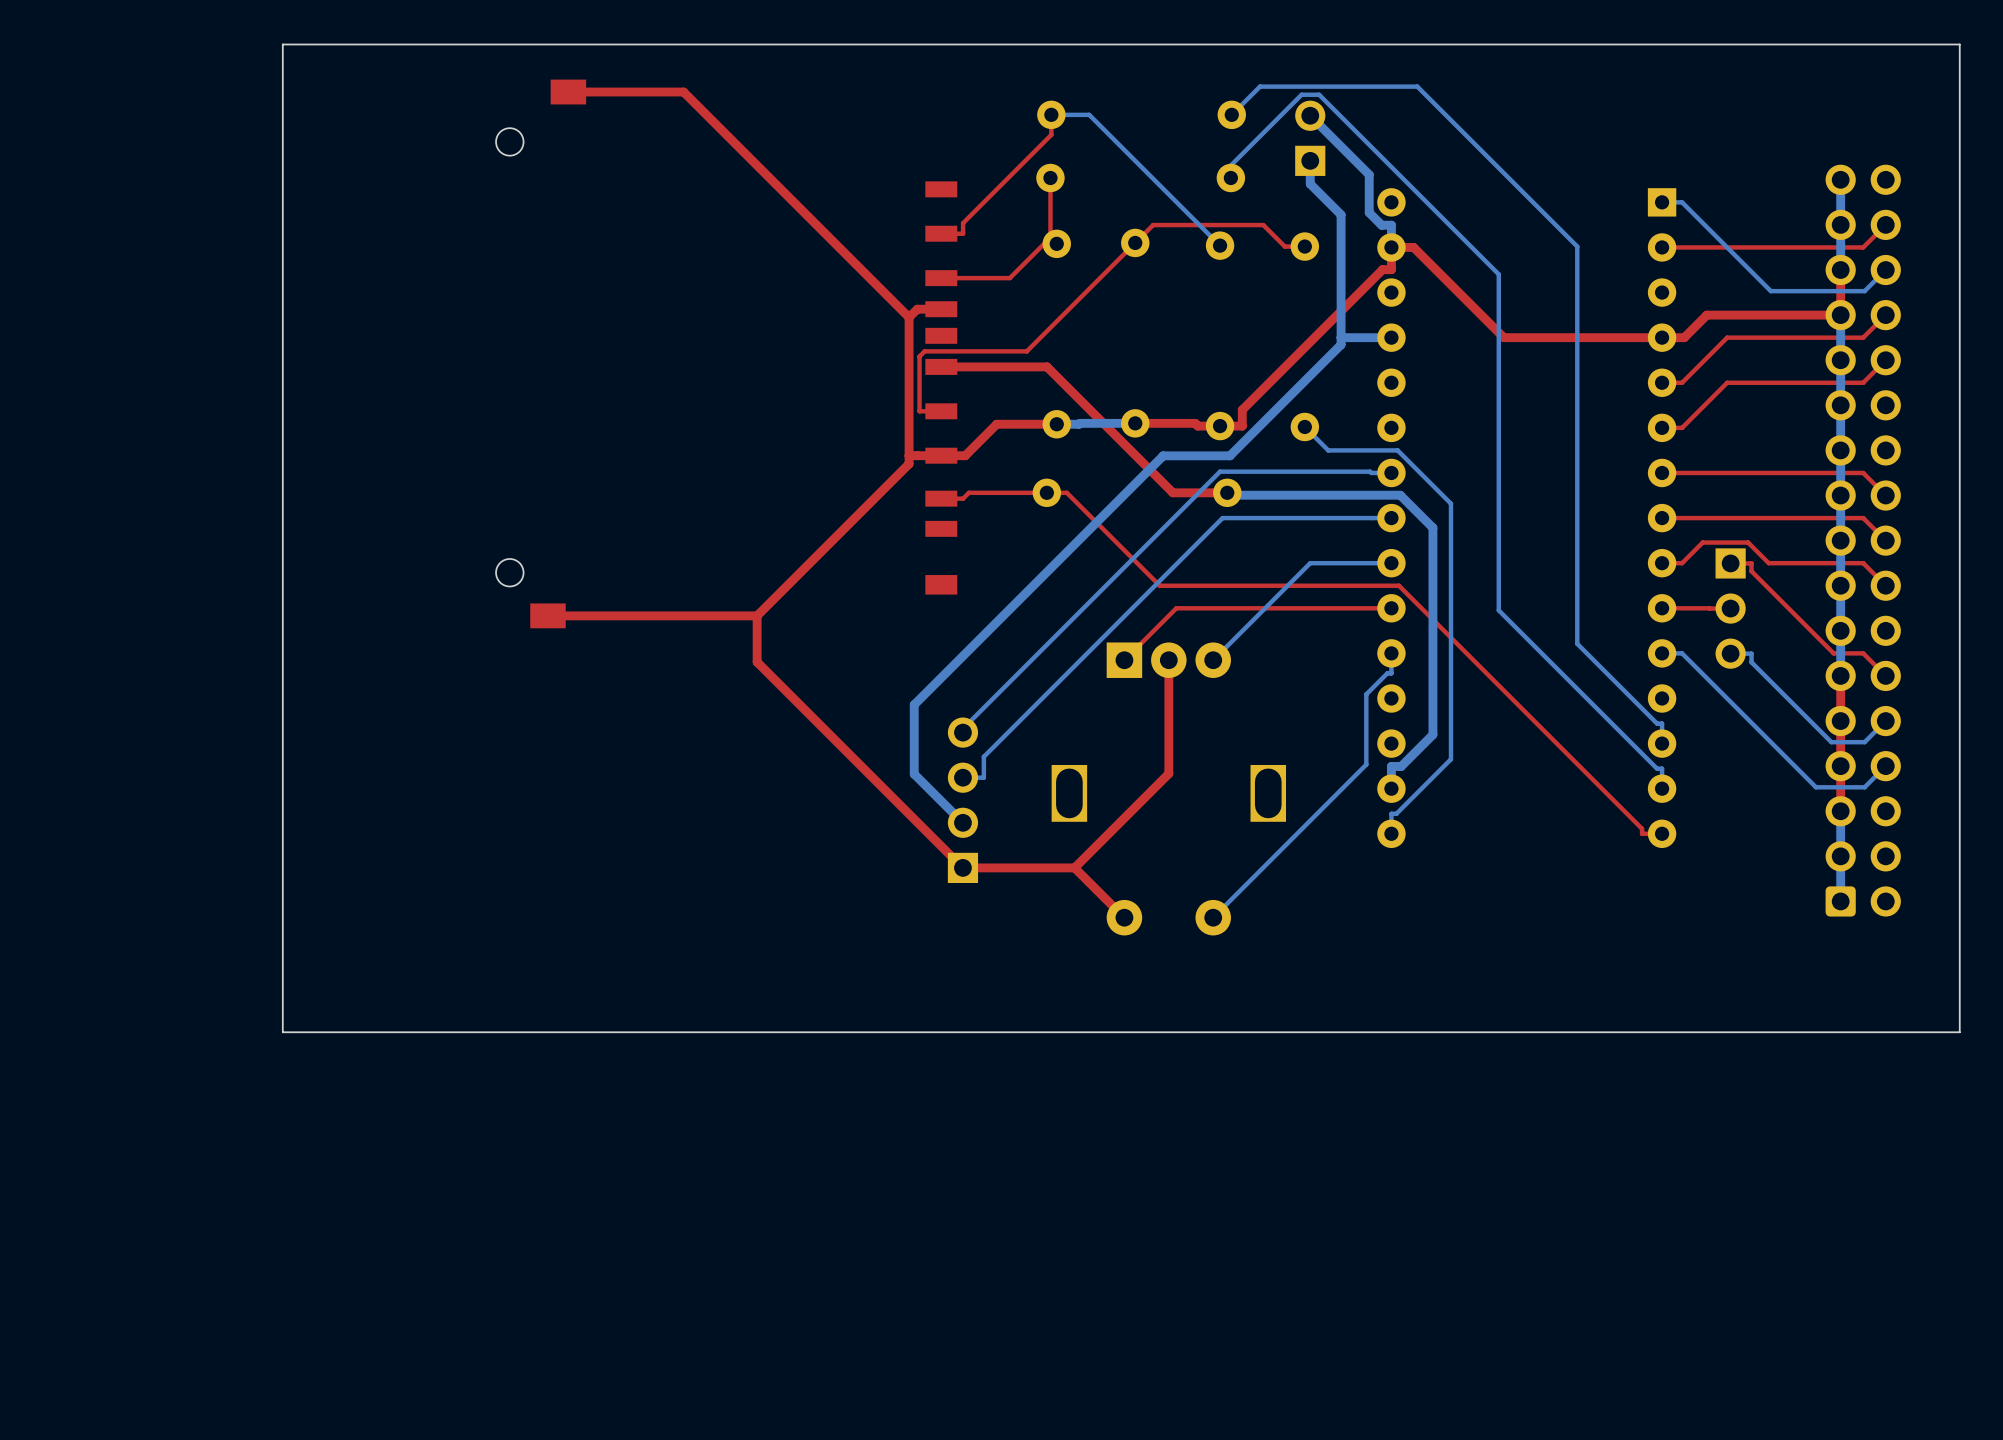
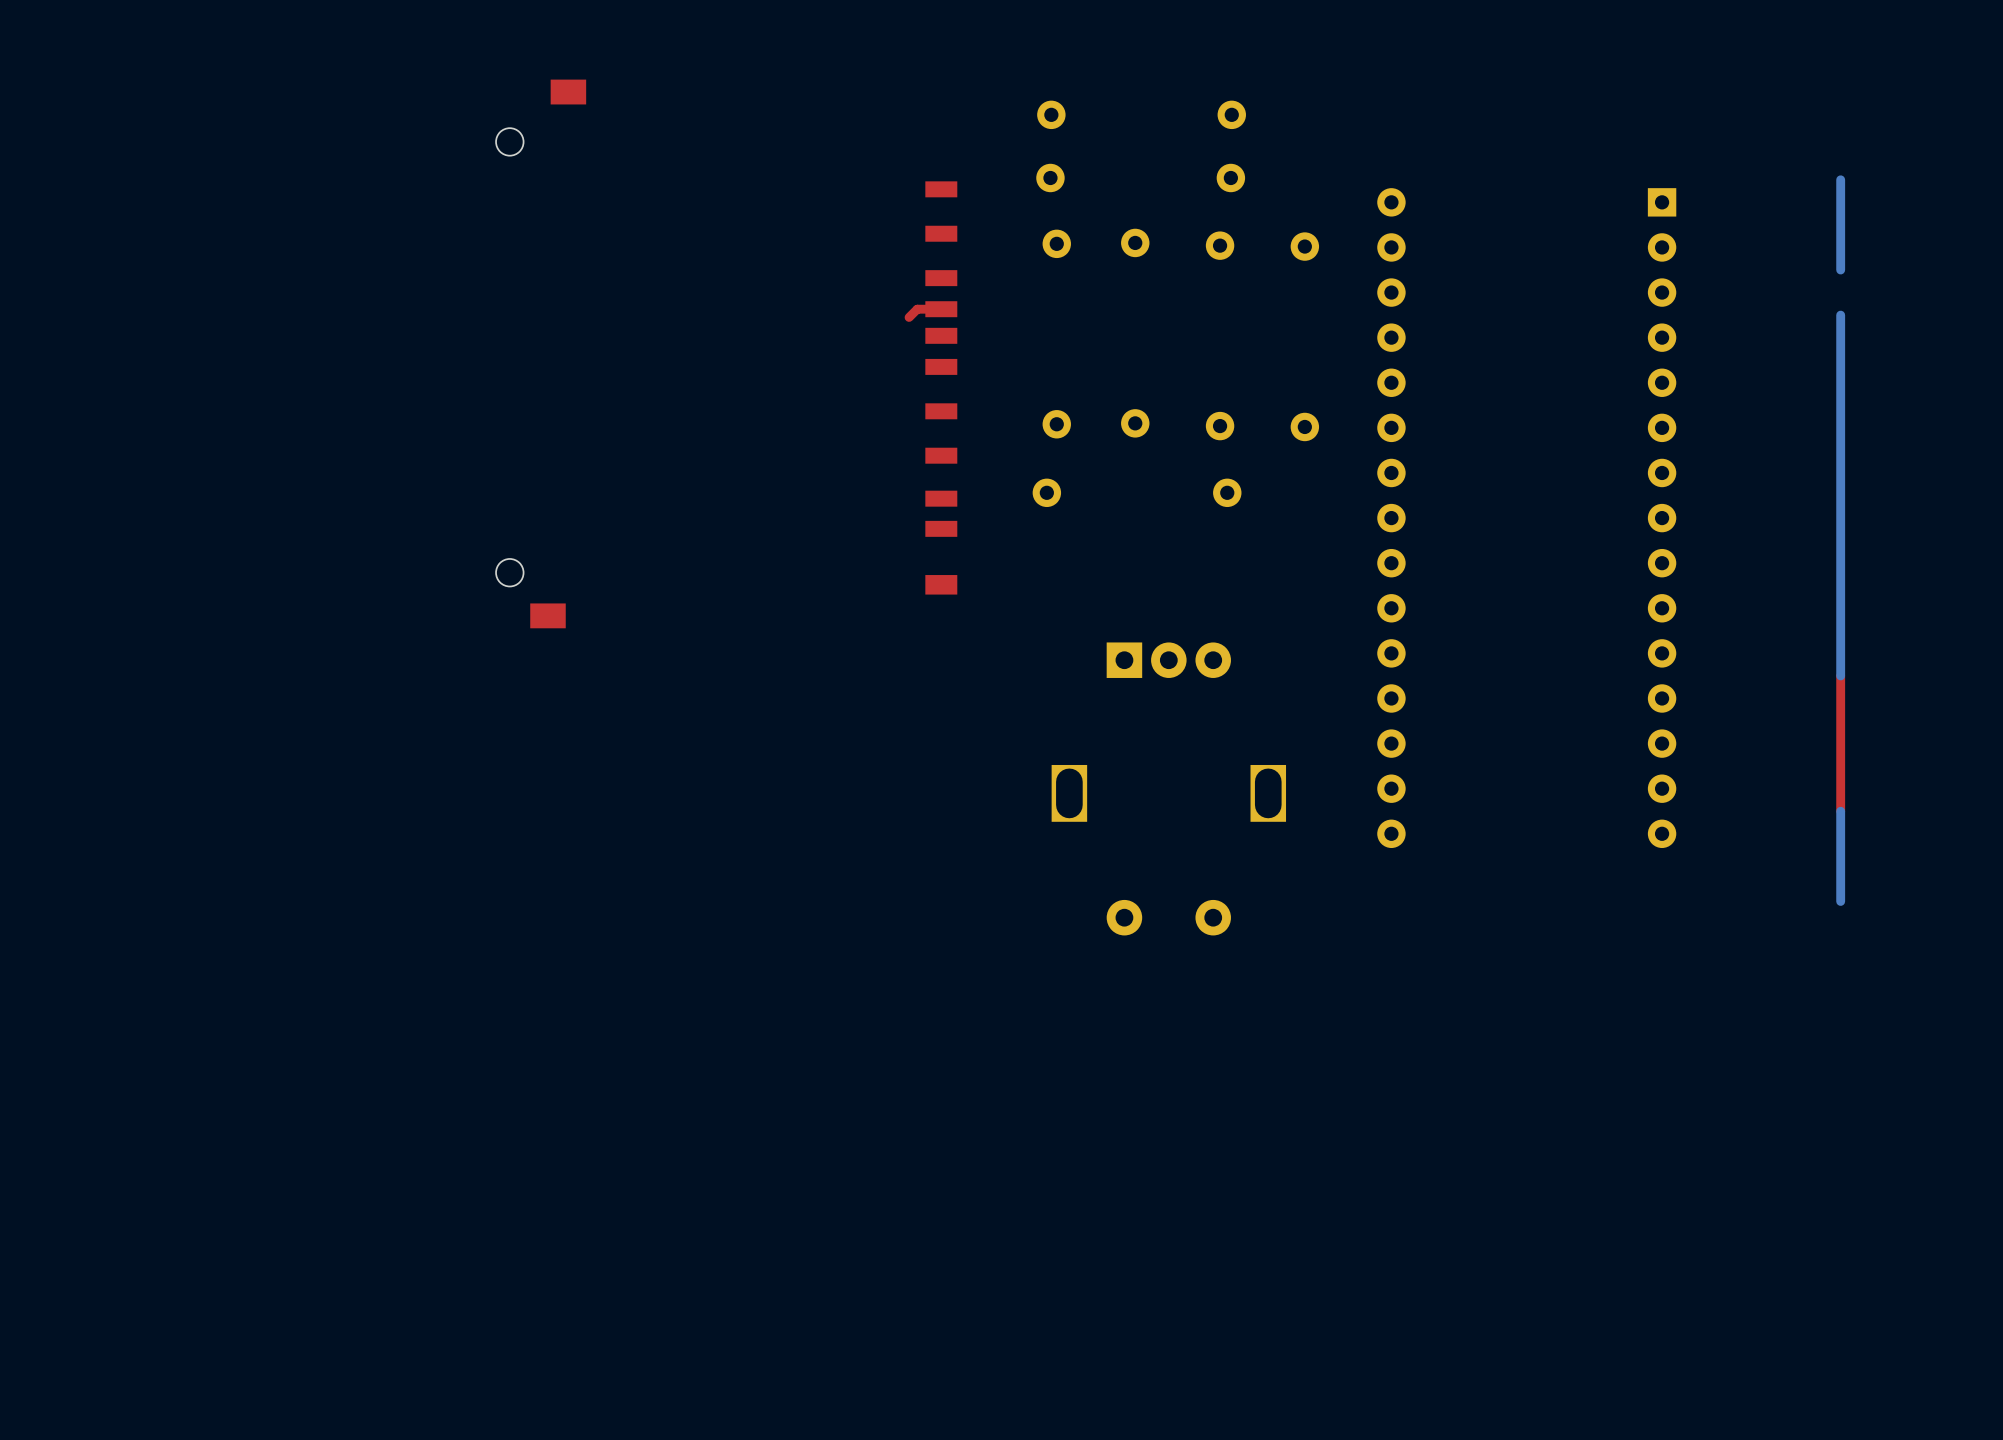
board edge: (1959, 44) (282, 44) (282, 1032) (1959, 1032) (1959, 44) -> none
top track: (568, 92) (683, 92) (909, 317) (909, 463) (757, 615) -> none
top track: (1051, 114) (1051, 134) (963, 223) (963, 233) (941, 233) -> none
bottom track: (1051, 114) (1089, 114) (1220, 245) -> none
bottom track: (1231, 114) (1260, 86) (1417, 86) (1577, 246) (1577, 643) (1657, 723) (1662, 723) (1662, 743) -> none
bottom track: (1310, 115) (1369, 174) (1369, 212) (1381, 225) (1391, 225) (1391, 247) -> none
part: (1310, 138) -> none
bottom track: (1310, 160) (1310, 183) (1341, 214) (1341, 344) (1229, 455) (1163, 455) (914, 704) (914, 774) (962, 822) -> none
top track: (1050, 177) (1050, 237) -> none
bottom track: (1230, 177) (1230, 165) (1301, 94) (1319, 94) (1498, 274) (1498, 610) (1657, 768) (1662, 768) (1662, 788) -> none
bottom track: (1662, 202) (1682, 202) (1770, 291) (1864, 291) (1885, 270) -> none
top track: (1885, 224) (1863, 247) (1662, 247) -> none
top track: (1050, 237) (1009, 278) (941, 278) -> none
top track: (1304, 246) (1284, 246) (1263, 225) (1153, 225) (1026, 351) (924, 351) (919, 356) (919, 411) (941, 411) -> none
top track: (1840, 270) (1840, 315) (1706, 315) (1684, 337) (1503, 337) (1413, 247) (1391, 247) (1391, 269) (1382, 269) (1242, 409) (1242, 426) (1197, 426) (1195, 423) (1135, 423) -> none
top track: (1885, 315) (1863, 337) (1727, 337) (1682, 382) (1662, 382) -> none
bottom track: (1391, 337) (1341, 337) -> none
top track: (1885, 360) (1863, 382) (1727, 382) (1682, 427) (1662, 427) -> none
top track: (941, 366) (1047, 366) (1172, 492) (1227, 492) -> none
bottom track: (1135, 423) (1056, 424) -> none
top track: (1056, 424) (996, 424) (965, 455) (909, 455) -> none
bottom track: (1304, 426) (1328, 450) (1397, 450) (1450, 503) (1450, 759) (1396, 813) (1391, 813) (1391, 833) -> none
bottom track: (1391, 472) (1220, 471) (962, 728) (962, 732) -> none
top track: (1662, 472) (1863, 472) (1885, 495) -> none
bottom track: (1227, 492) (1229, 495) (1400, 495) (1432, 527) (1432, 734) (1401, 766) (1391, 766) (1391, 788) -> none
top track: (941, 498) (963, 498) (968, 492) (1066, 492) (1159, 585) (1398, 585) (1642, 828) (1642, 833) (1662, 833) -> none
bottom track: (1391, 518) (1222, 518) (983, 756) (983, 777) (962, 777) -> none
top track: (1662, 518) (1863, 518) (1885, 540) -> none
part: (1863, 540) -> none
bottom track: (1391, 563) (1310, 563) (1213, 660) -> none
top track: (1662, 563) (1682, 563) (1702, 542) (1748, 542) (1768, 563) (1863, 563) (1885, 585) -> none
top track: (1730, 563) (1751, 563) (1751, 571) (1833, 653) (1863, 653) (1885, 675) -> none
top track: (1391, 608) (1176, 608) (1124, 660) -> none
top track: (1662, 608) (1730, 608) -> none
part: (1730, 608) -> none
top track: (757, 615) (757, 662) (962, 867) (1074, 867) -> none
top track: (757, 615) (547, 615) -> none
bottom track: (1391, 653) (1391, 673) (1387, 673) (1366, 694) (1366, 764) (1213, 917) -> none
bottom track: (1662, 653) (1682, 653) (1815, 787) (1864, 787) (1885, 766) -> none
bottom track: (1730, 653) (1751, 653) (1751, 662) (1831, 742) (1864, 742) (1885, 721) -> none
top track: (1168, 660) (1168, 773) (1074, 867) -> none
part: (962, 800) -> none
top track: (1074, 867) (1124, 917) -> none

